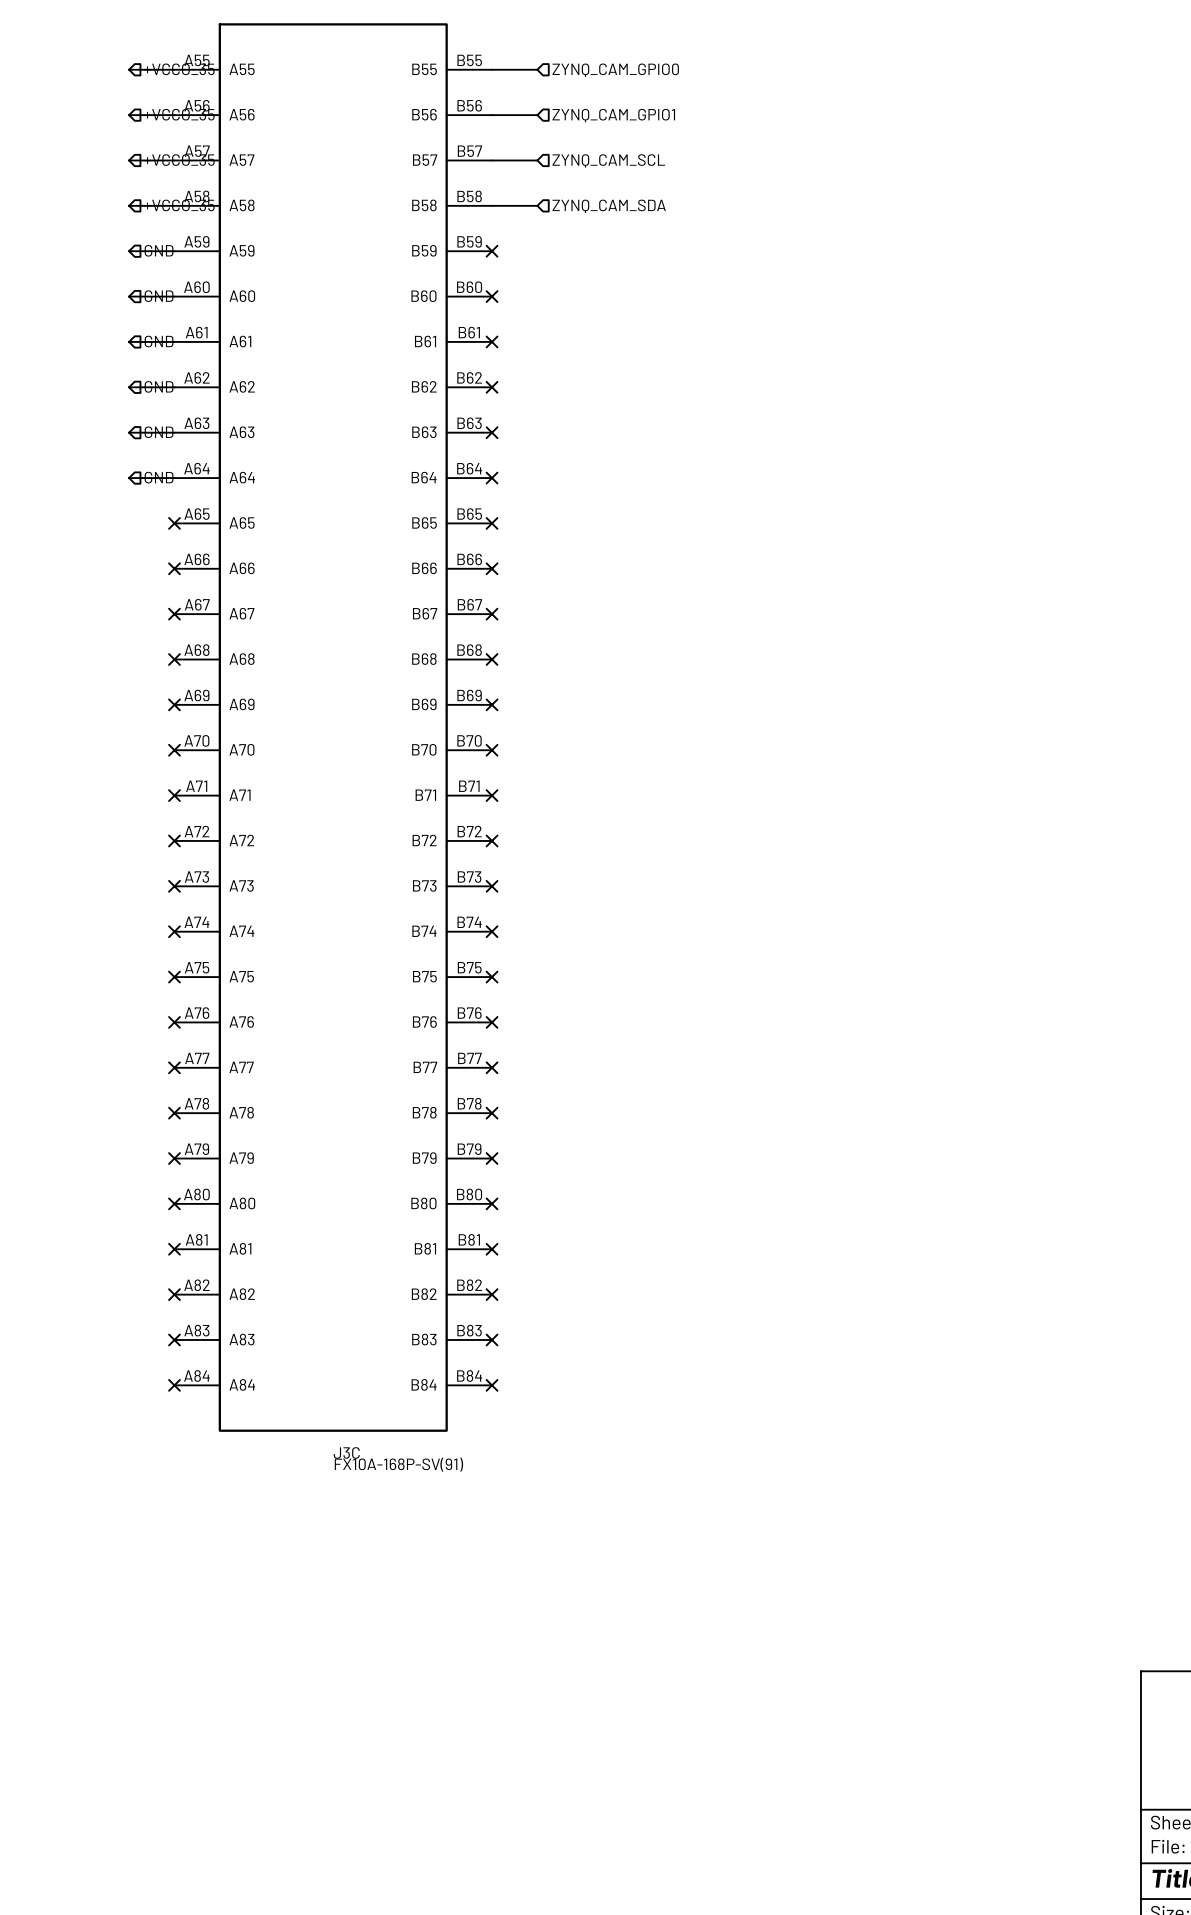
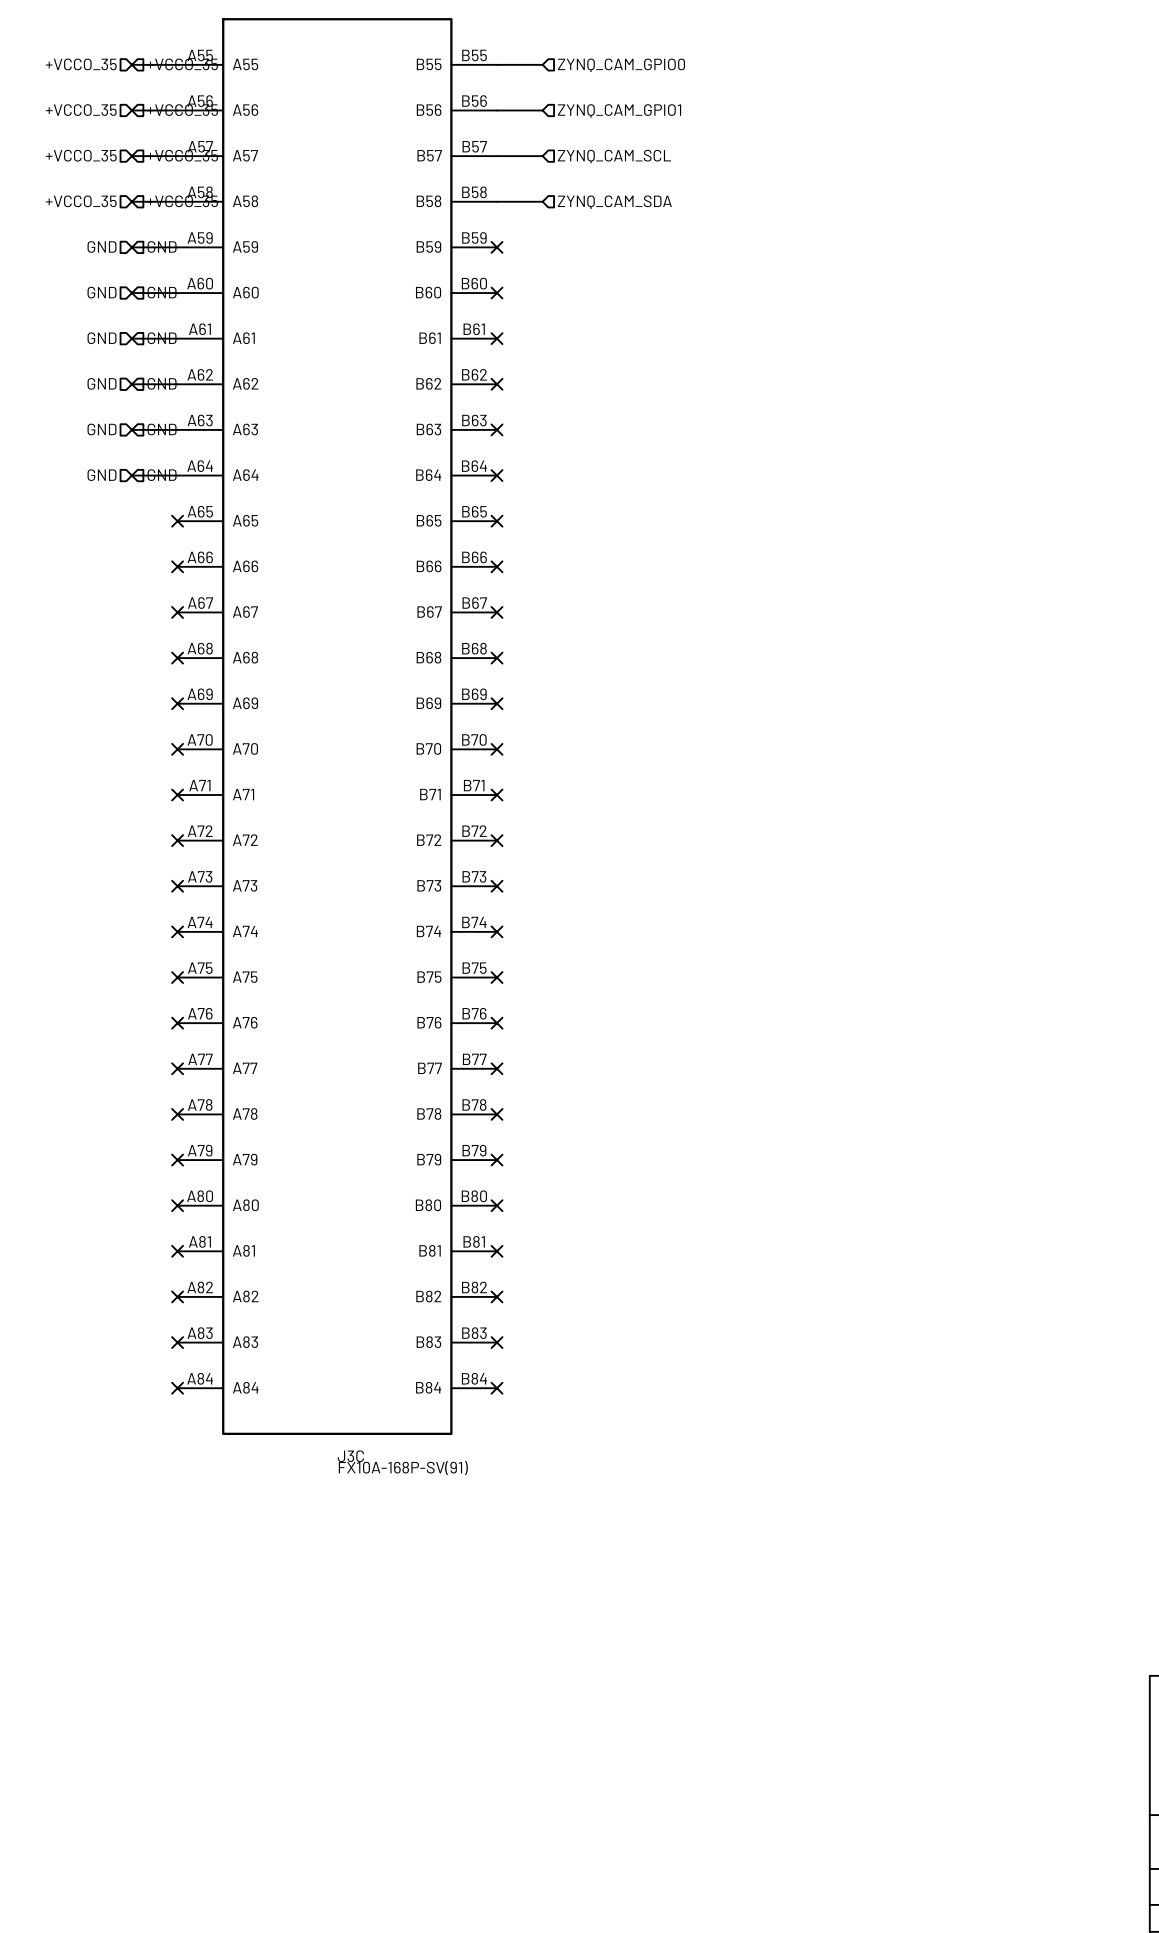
hierarchical label: none -> +VCCO_35 (81, 64)
hierarchical label: none -> +VCCO_35 (81, 110)
hierarchical label: none -> +VCCO_35 (81, 155)
hierarchical label: none -> +VCCO_35 (81, 201)
hierarchical label: none -> GND (102, 246)
hierarchical label: none -> GND (102, 292)
hierarchical label: none -> GND (102, 338)
hierarchical label: none -> GND (102, 383)
hierarchical label: none -> GND (102, 429)
hierarchical label: none -> GND (102, 475)

